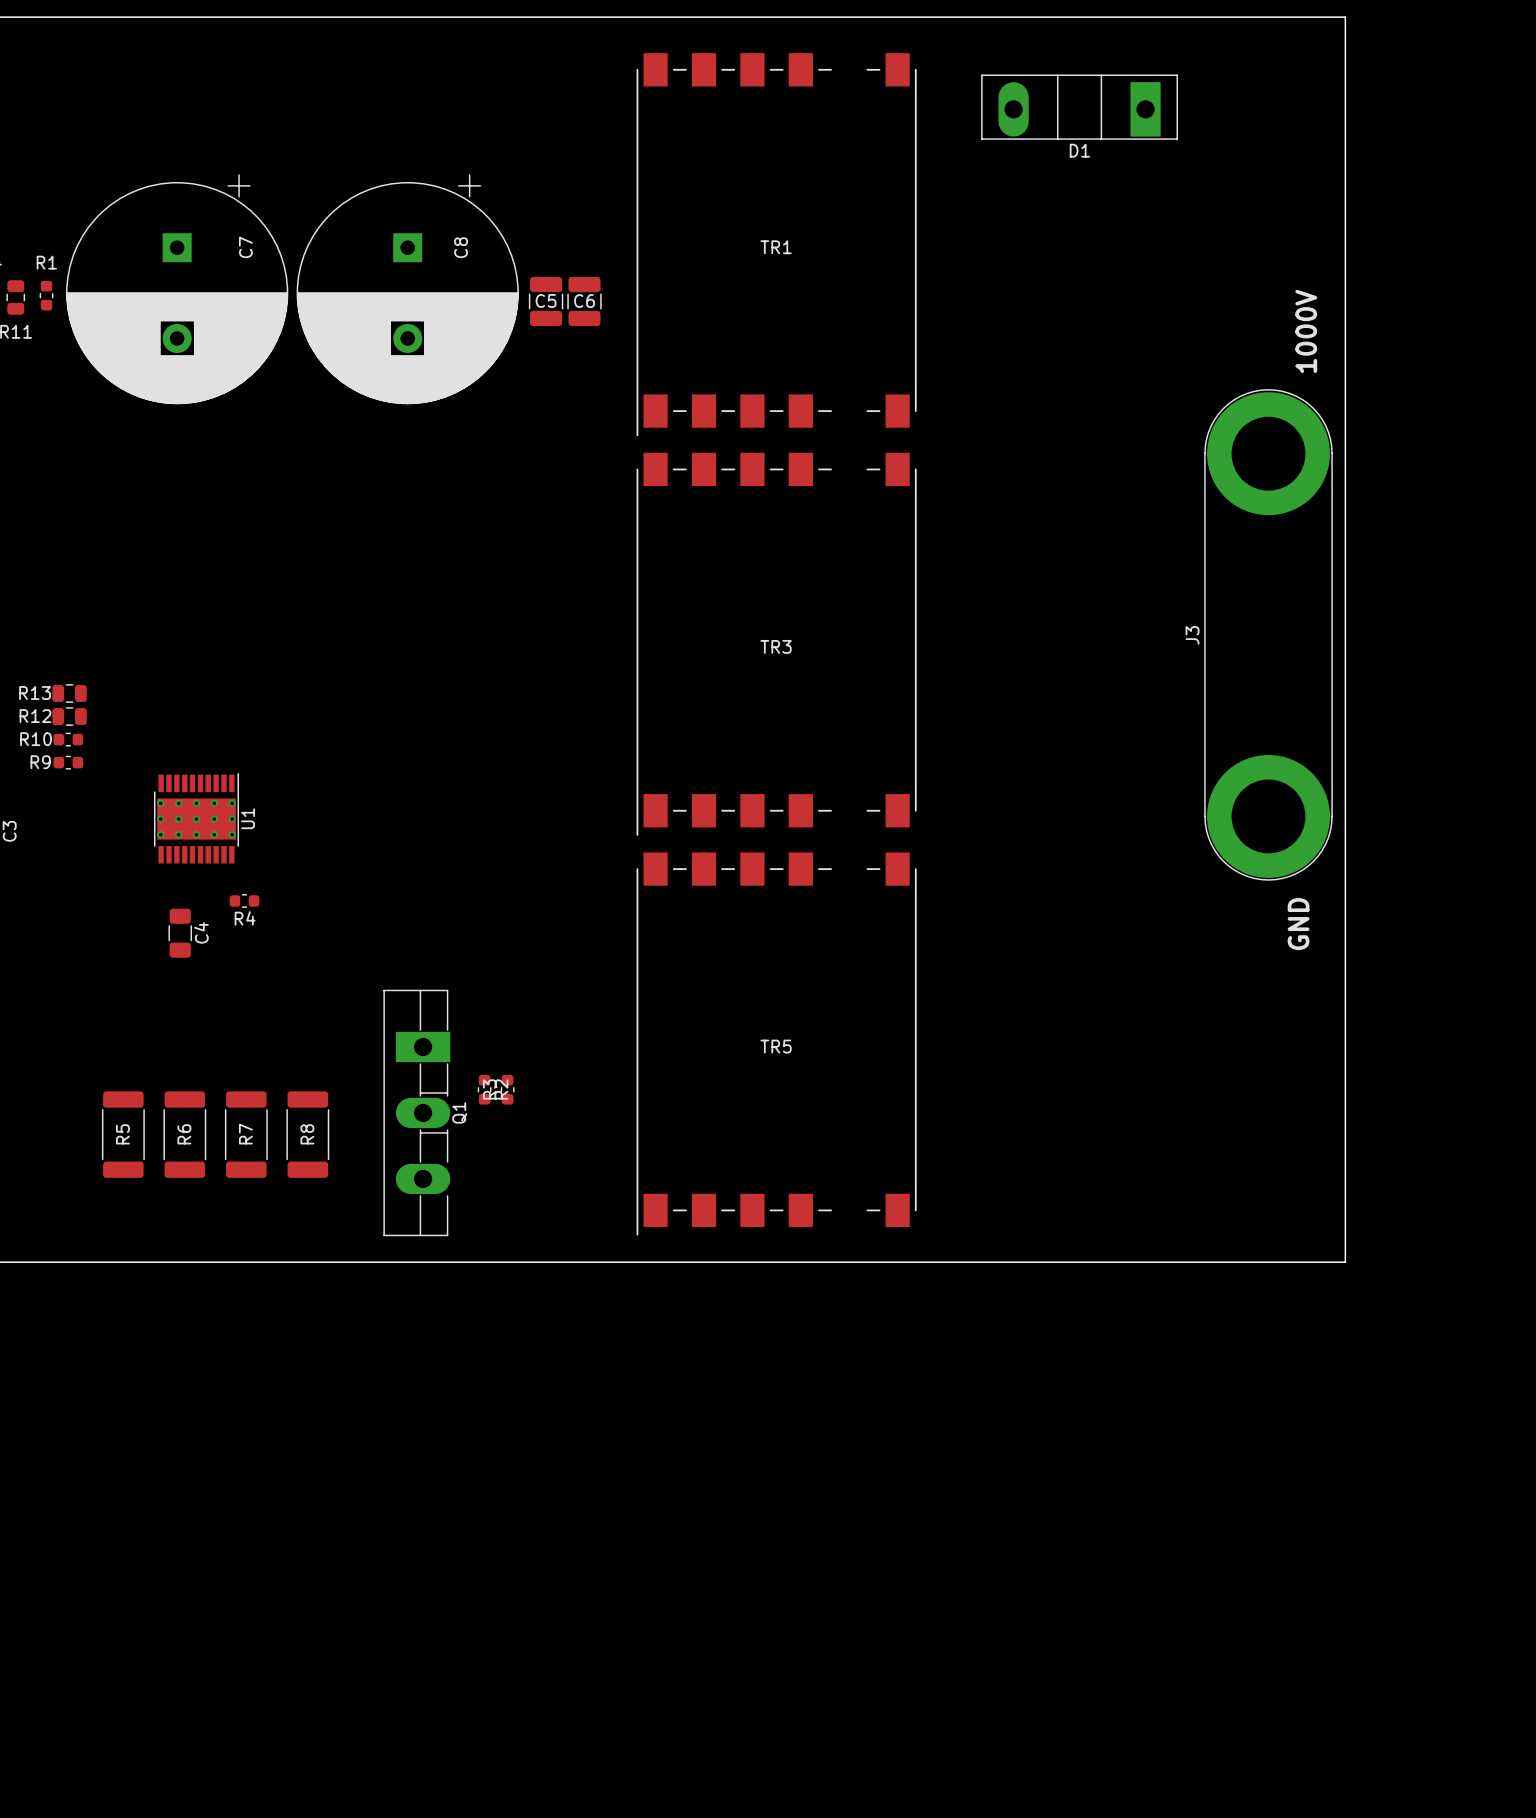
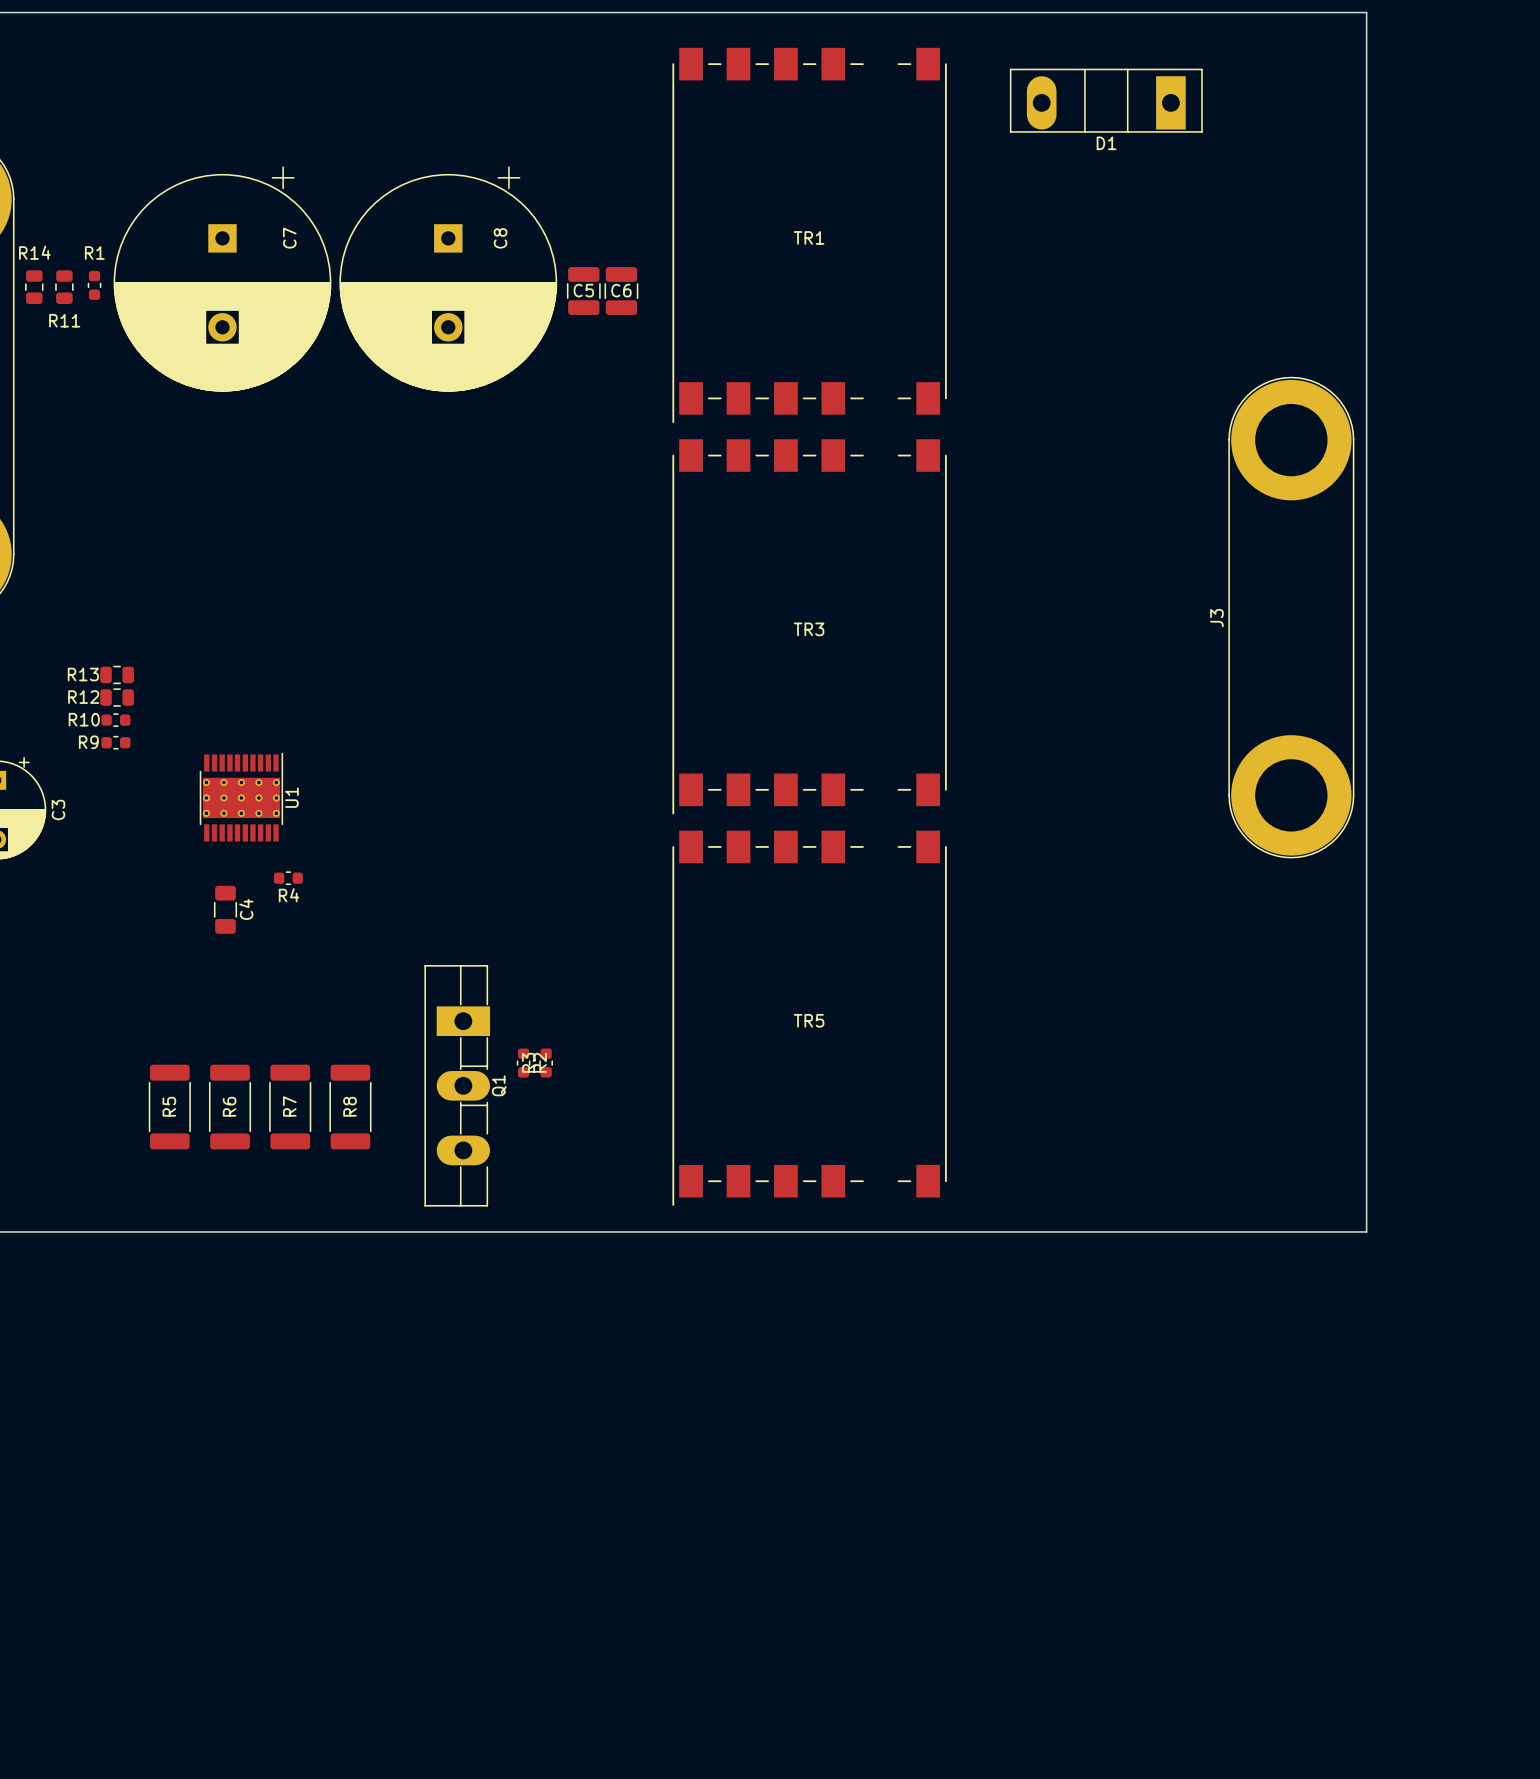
text: 1000V (1306, 331) -> none
text: GND (1298, 924) -> none

